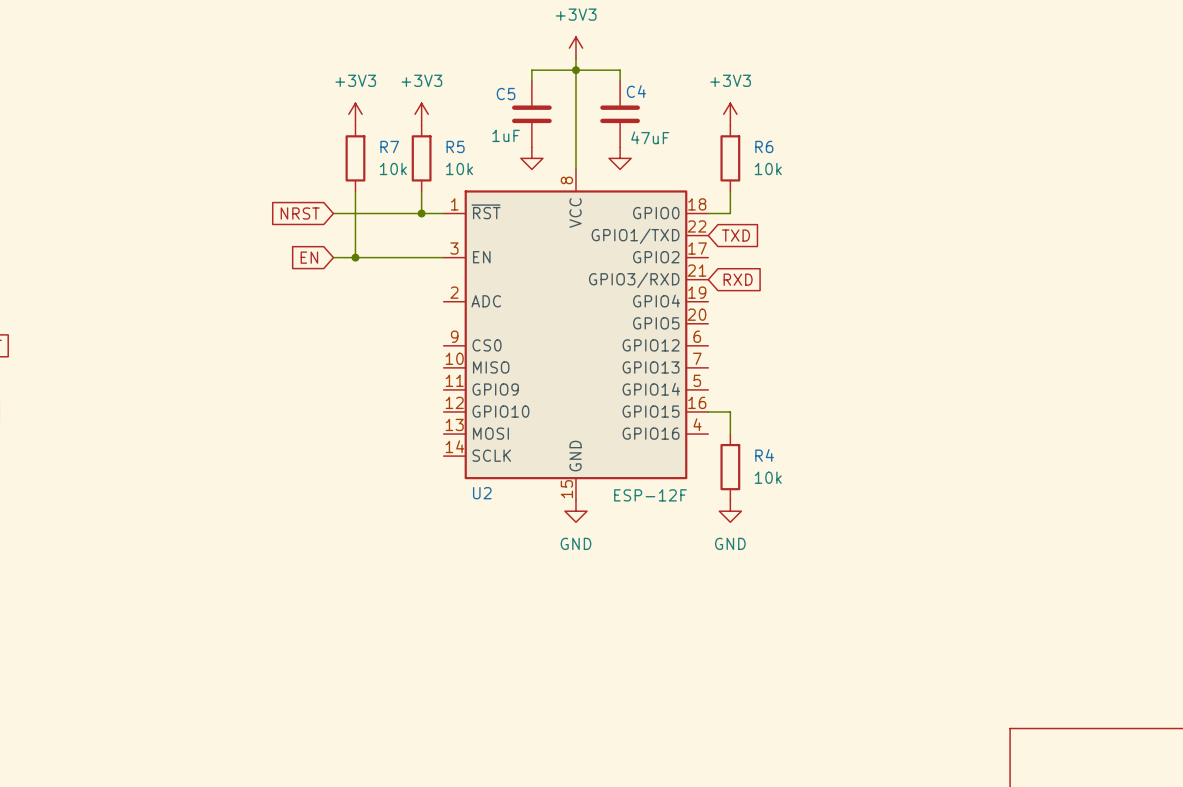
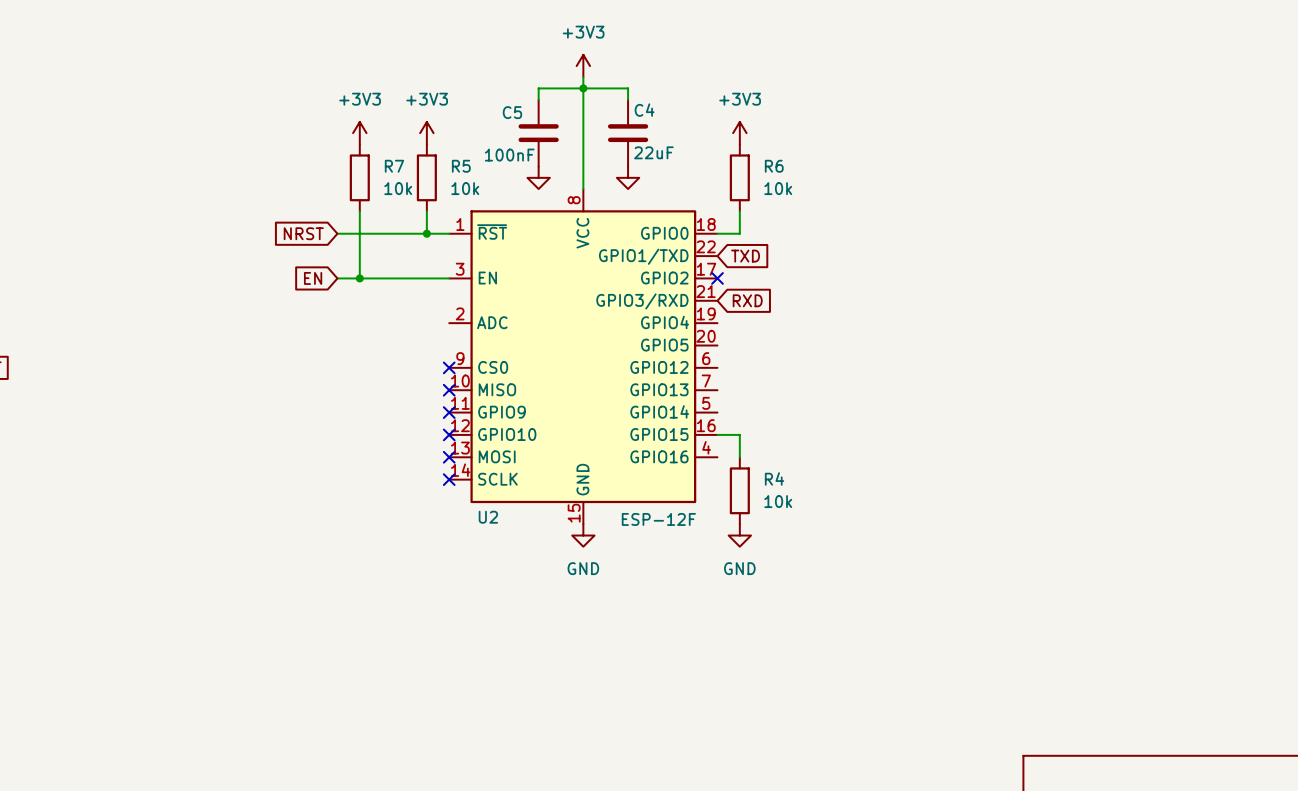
C5 value: 1uF (506, 135) -> 100nF (509, 155)
C4 value: 47uF (650, 137) -> 22uF (653, 152)
no-connect mark: none -> (717, 278)
no-connect mark: none -> (449, 367)
no-connect mark: none -> (449, 390)
no-connect mark: none -> (449, 412)
no-connect mark: none -> (449, 434)
no-connect mark: none -> (449, 457)
no-connect mark: none -> (449, 479)

